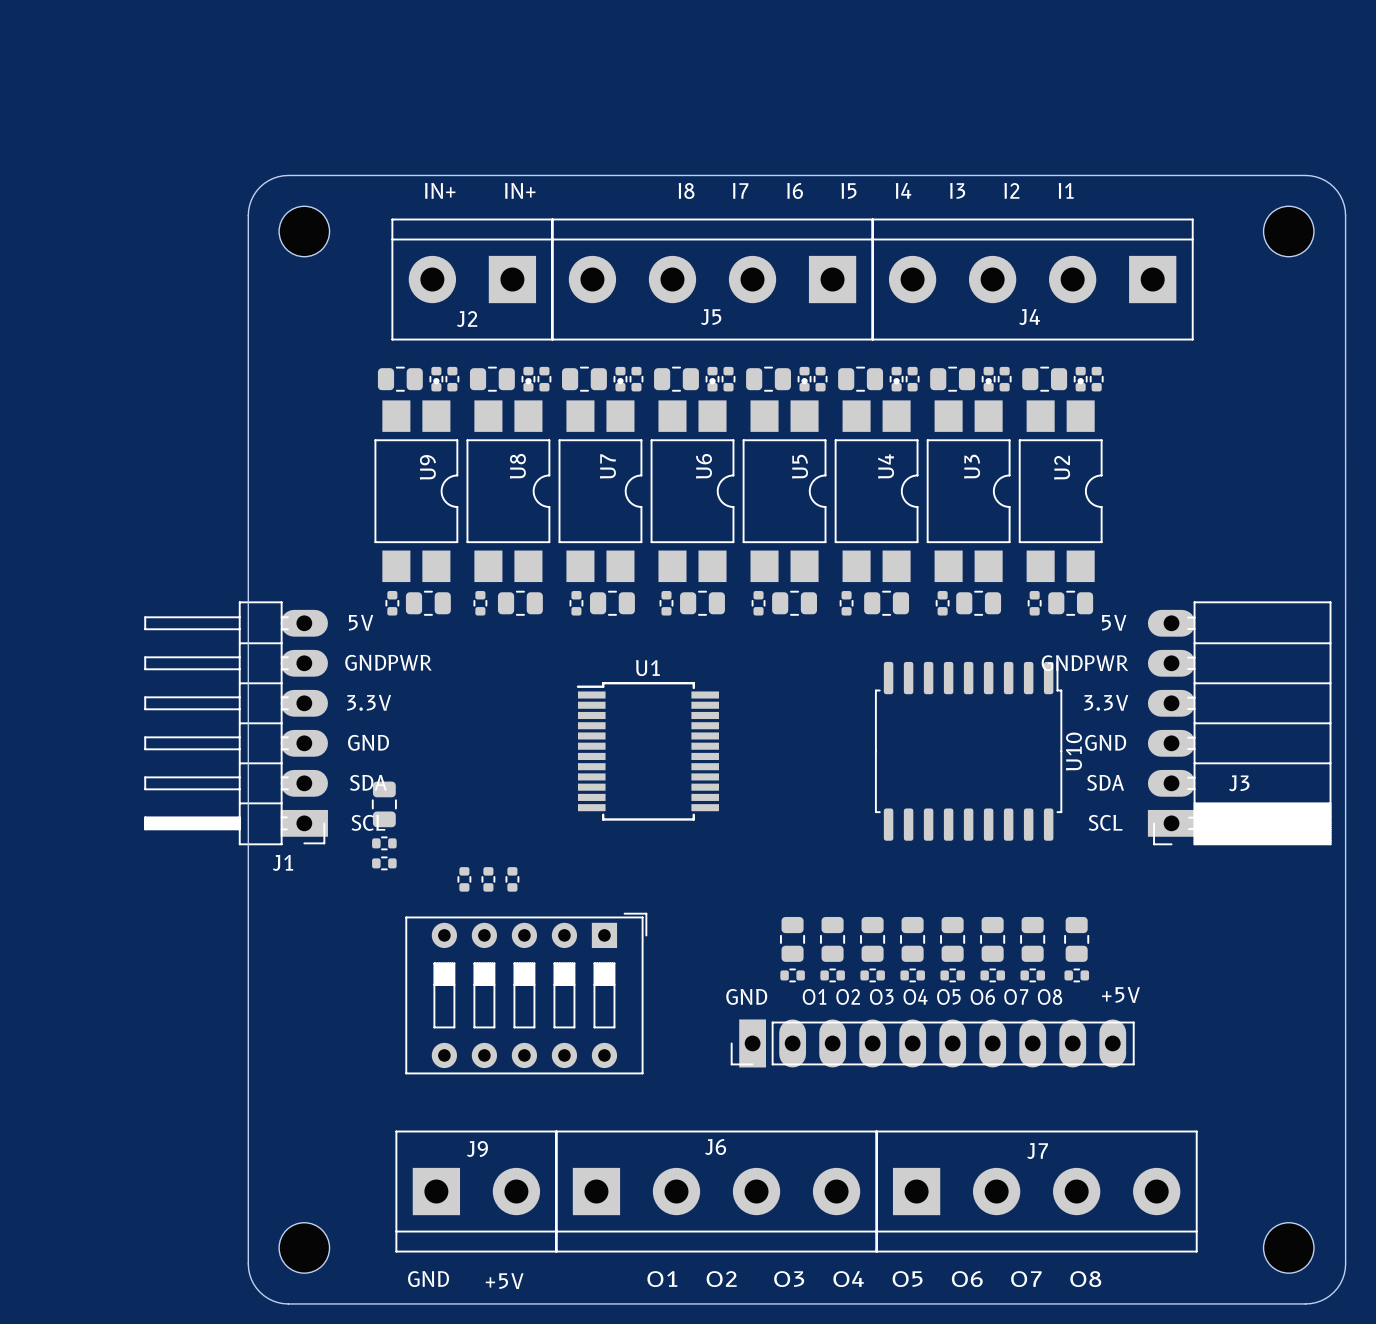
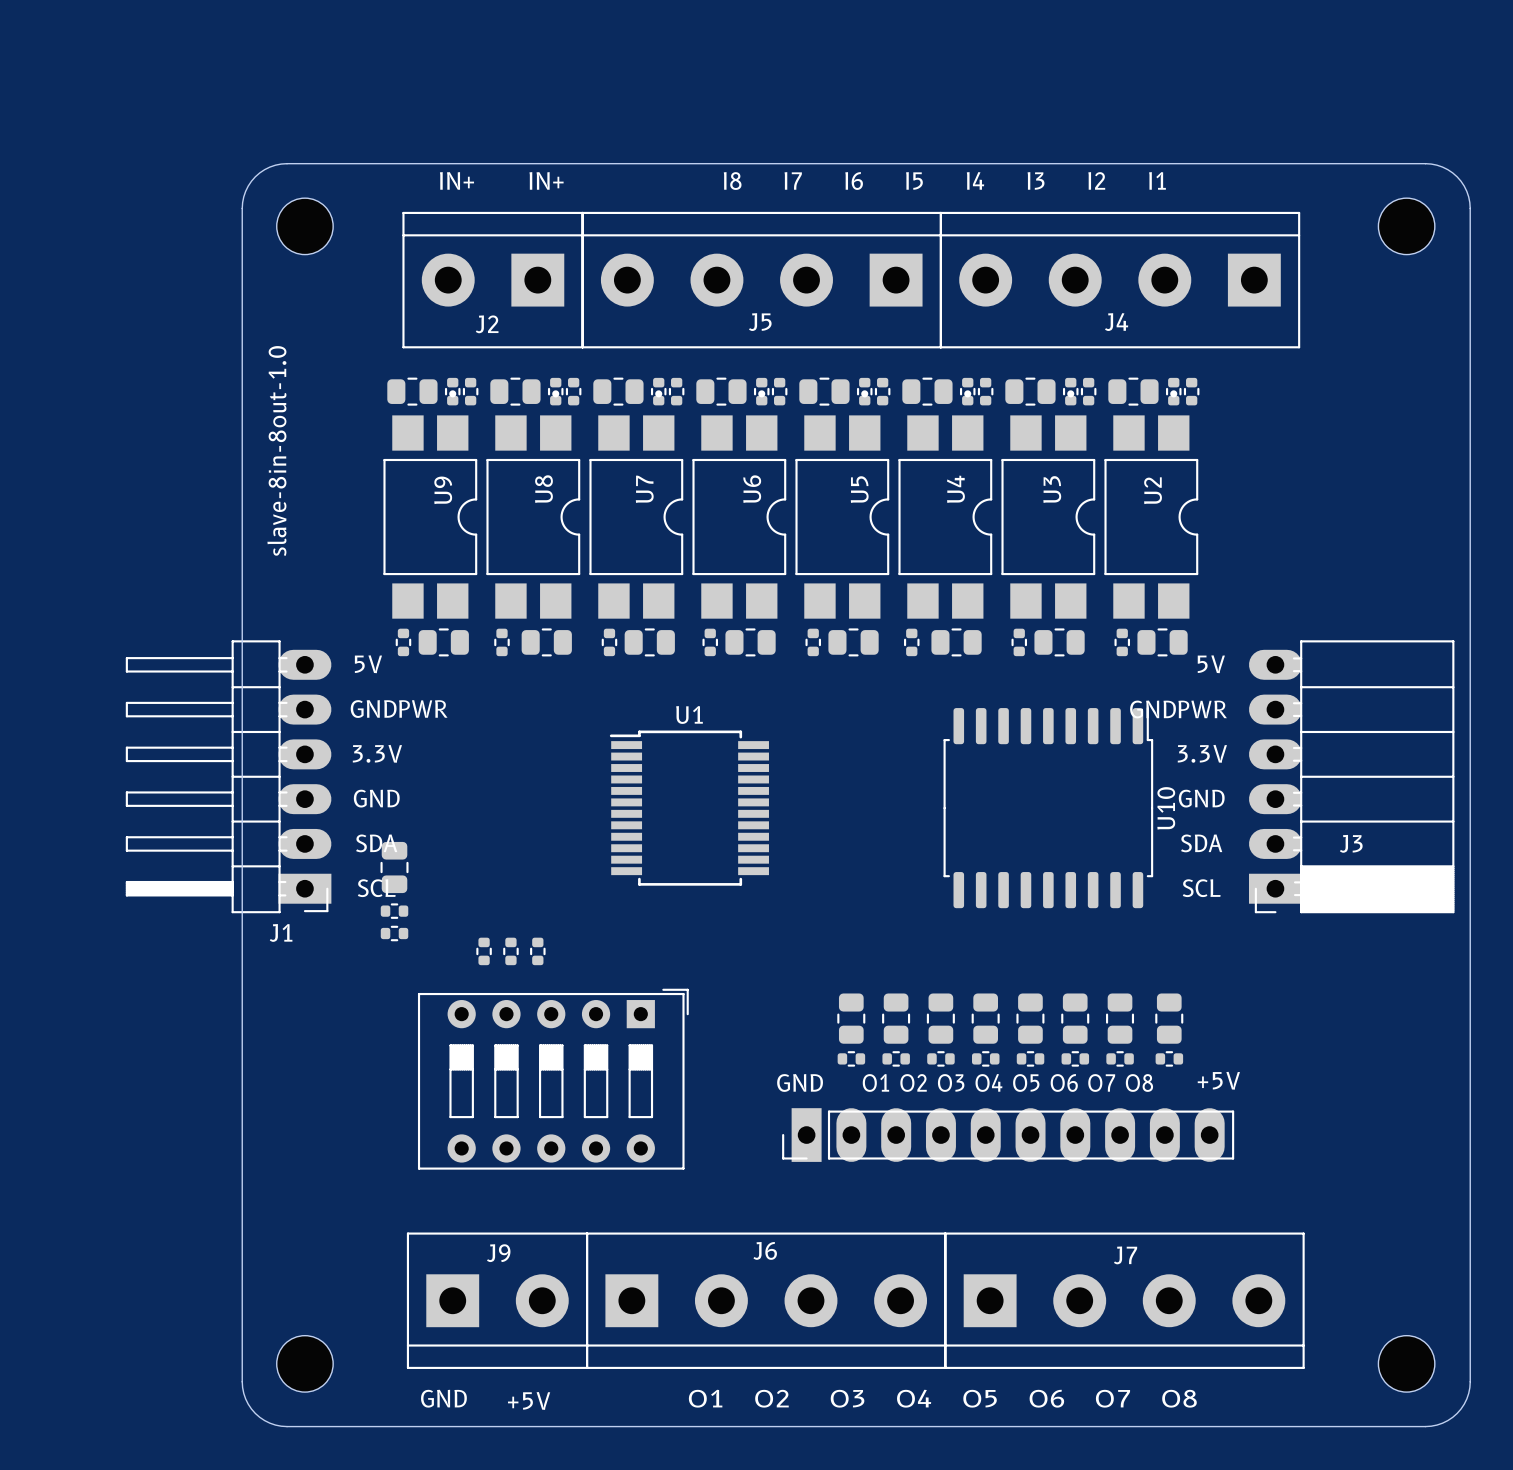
text: none -> slave-8in-8out-1.0 (276, 451)

